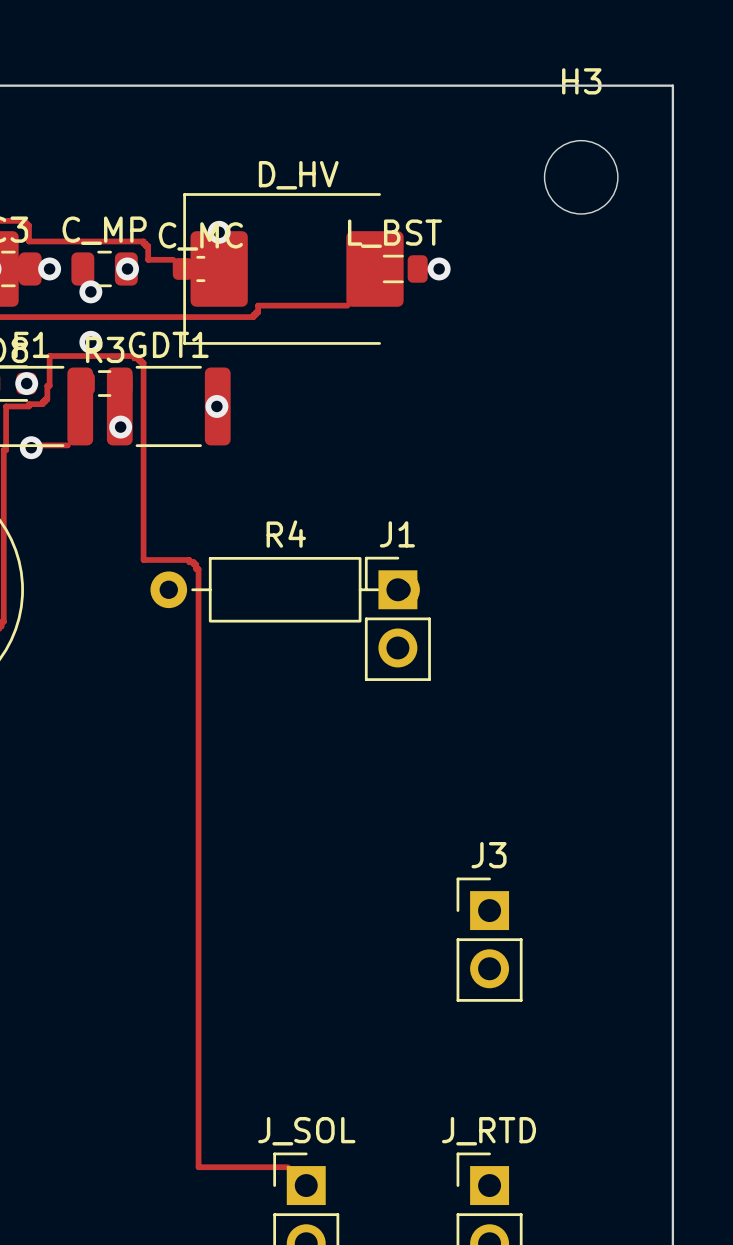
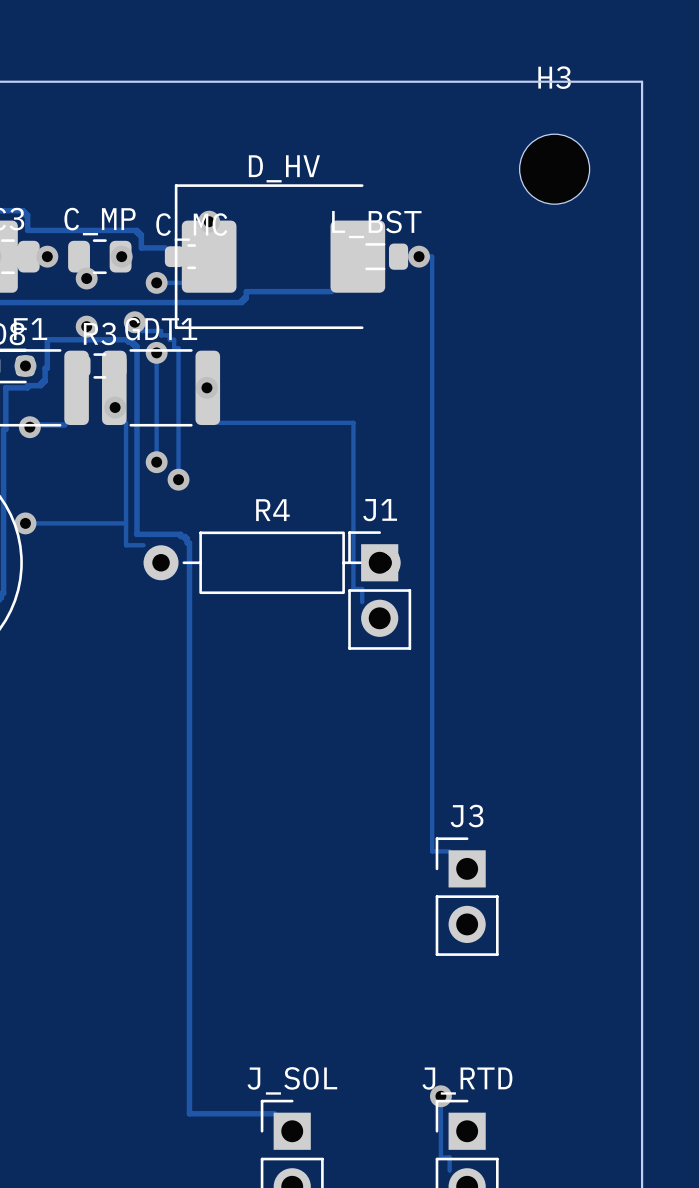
track: none -> (419, 256) (432, 256) (432, 851) (449, 851)
track: none -> (156, 282) (182, 282)
via: none -> (156, 282)
track: none -> (134, 322) (134, 331) (161, 331) (161, 335) (169, 335) (169, 339) (174, 339) (174, 348) (178, 348) (178, 479)
via: none -> (134, 322)
track: none -> (156, 352) (156, 462)
via: none -> (156, 352)
track: none -> (126, 422) (126, 545) (143, 545)
track: none -> (217, 422) (353, 422) (353, 589) (362, 589) (362, 602)
via: none -> (156, 462)
via: none -> (178, 479)
track: none -> (25, 523) (126, 523)
via: none -> (25, 523)
track: none -> (440, 1096) (440, 1157) (449, 1157) (449, 1170)
via: none -> (440, 1096)

